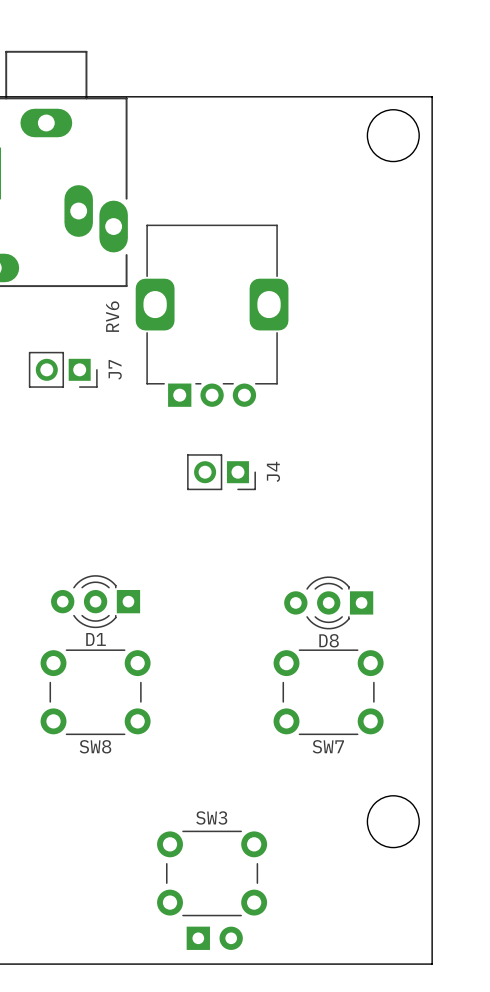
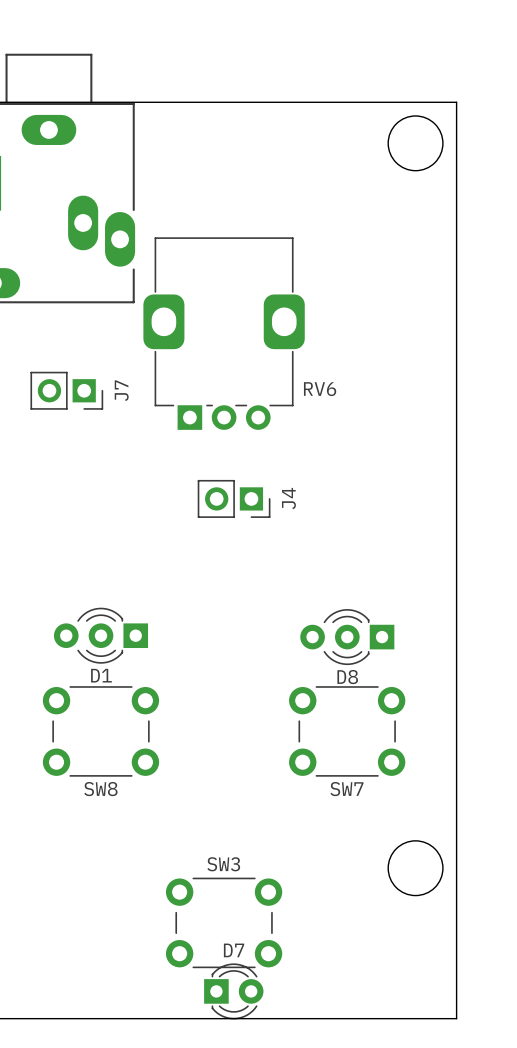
RV6 name rotation: 0° (112, 316) -> 90° clockwise (320, 389)
RV6 name position: RV6 (112, 316) -> RV6 (320, 389)
D7 side: bottom (214, 938) -> top (233, 991)

